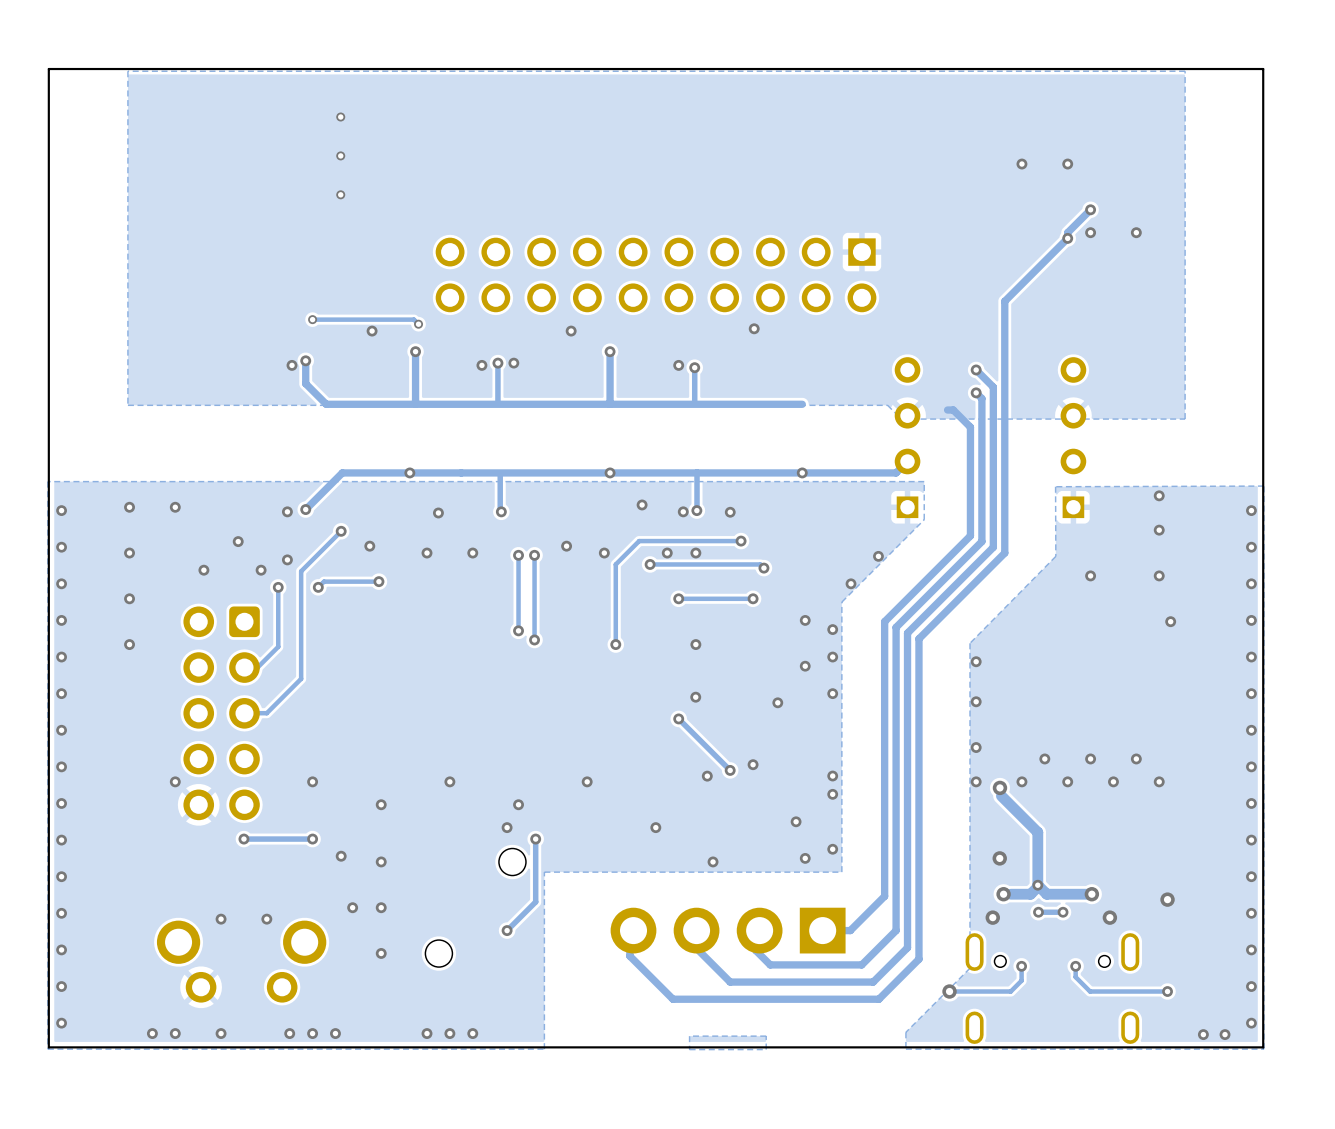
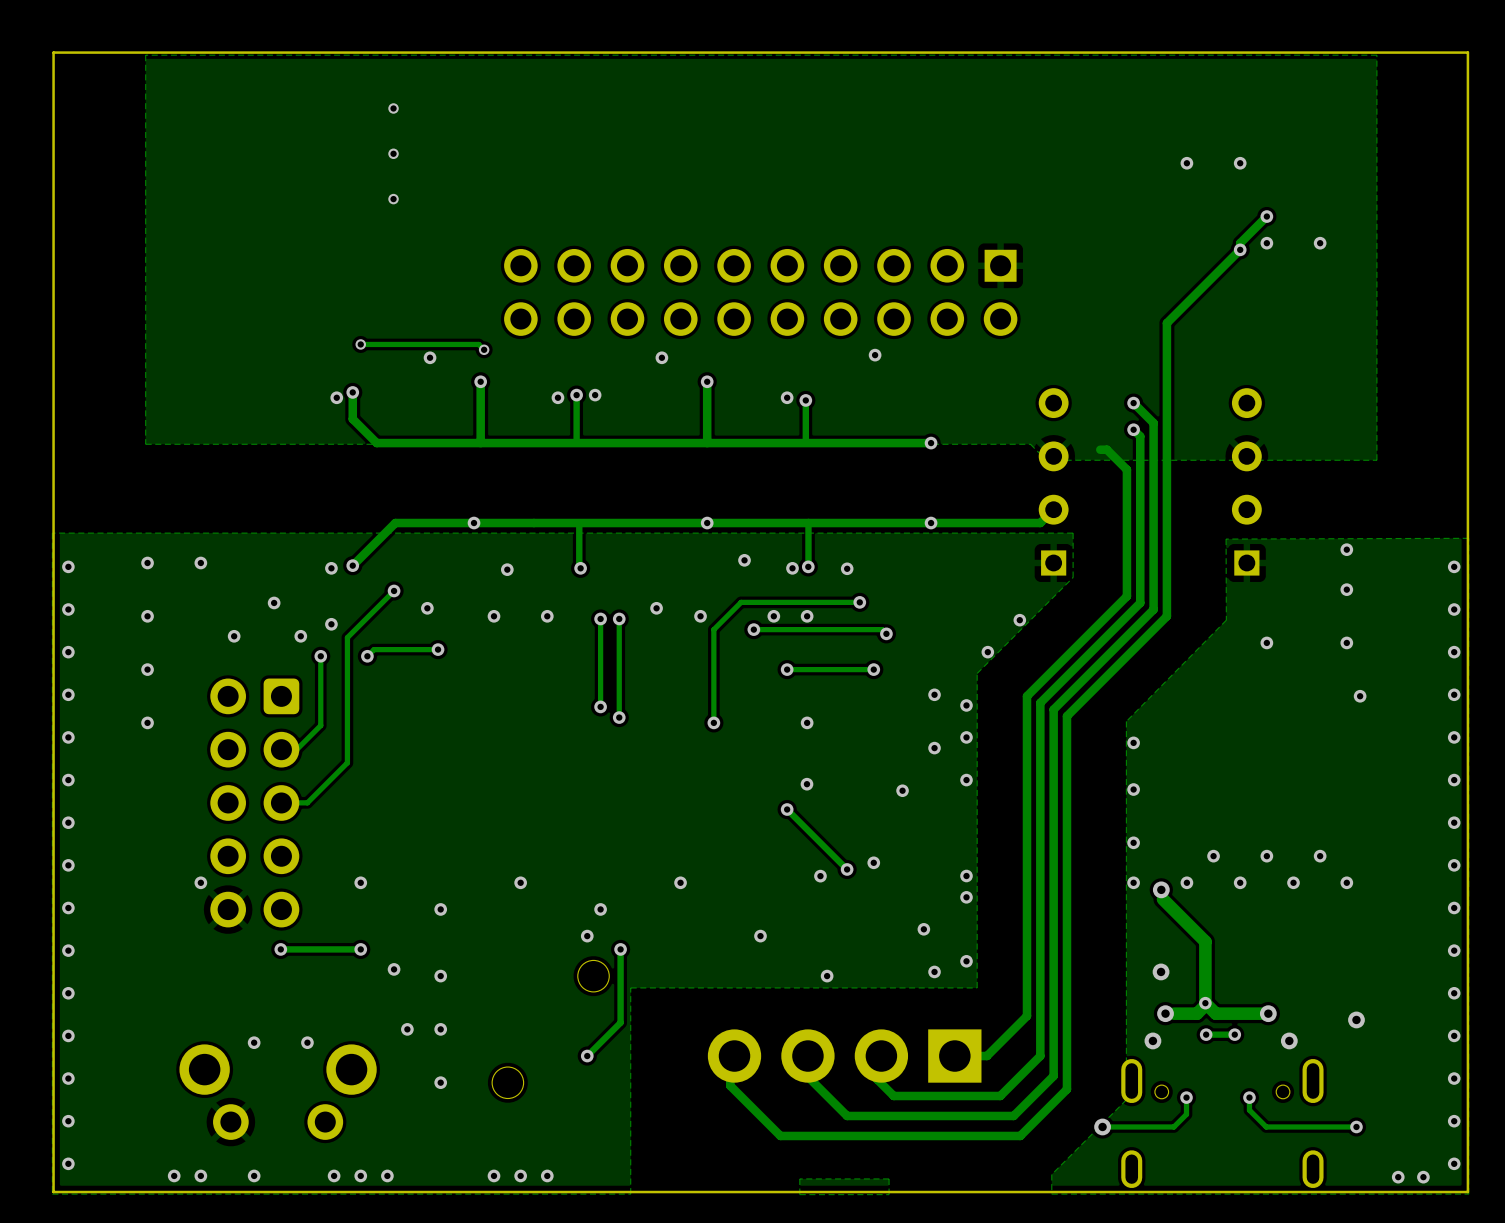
via: none -> (931, 443)

